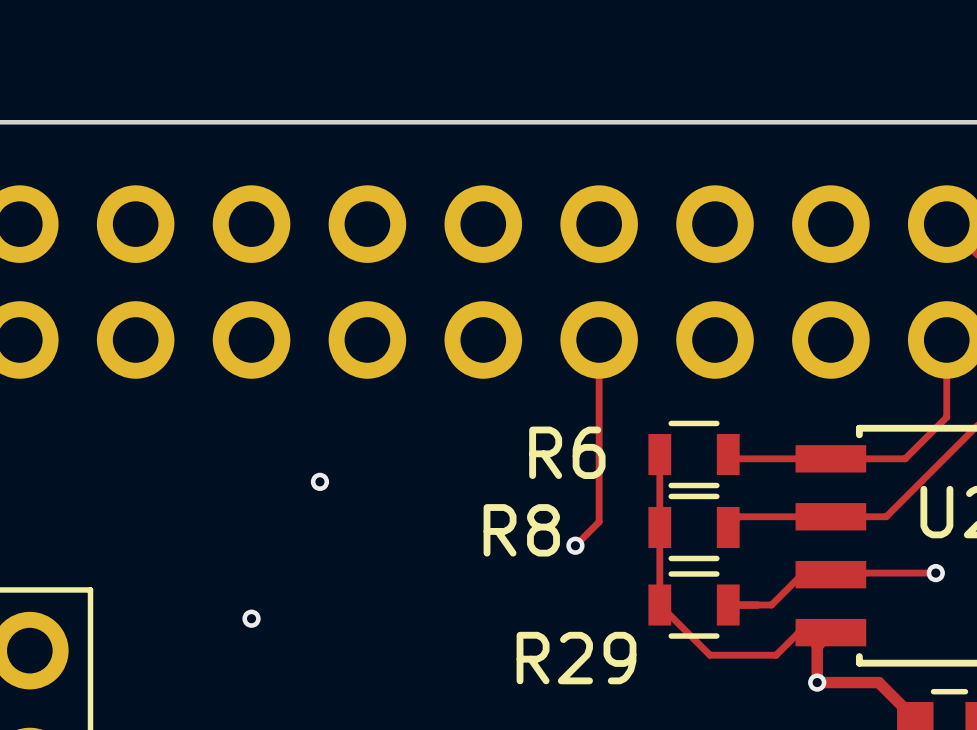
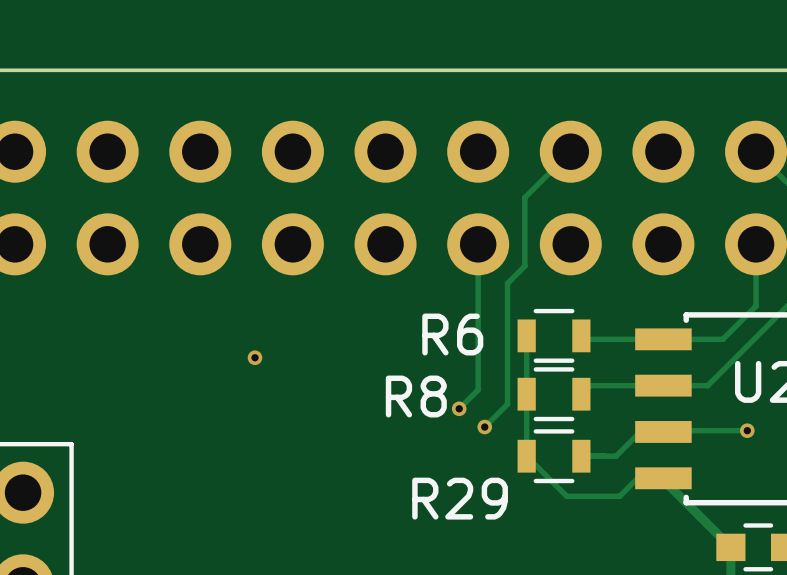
track: none -> (570, 151) (524, 197) (524, 266) (507, 283) (507, 404) (484, 427)
via: none -> (484, 427)
via: (251, 618) -> none
track: (830, 632) (817, 646) (817, 682) (878, 682) -> (663, 478) (701, 518)
via: (817, 682) -> none

